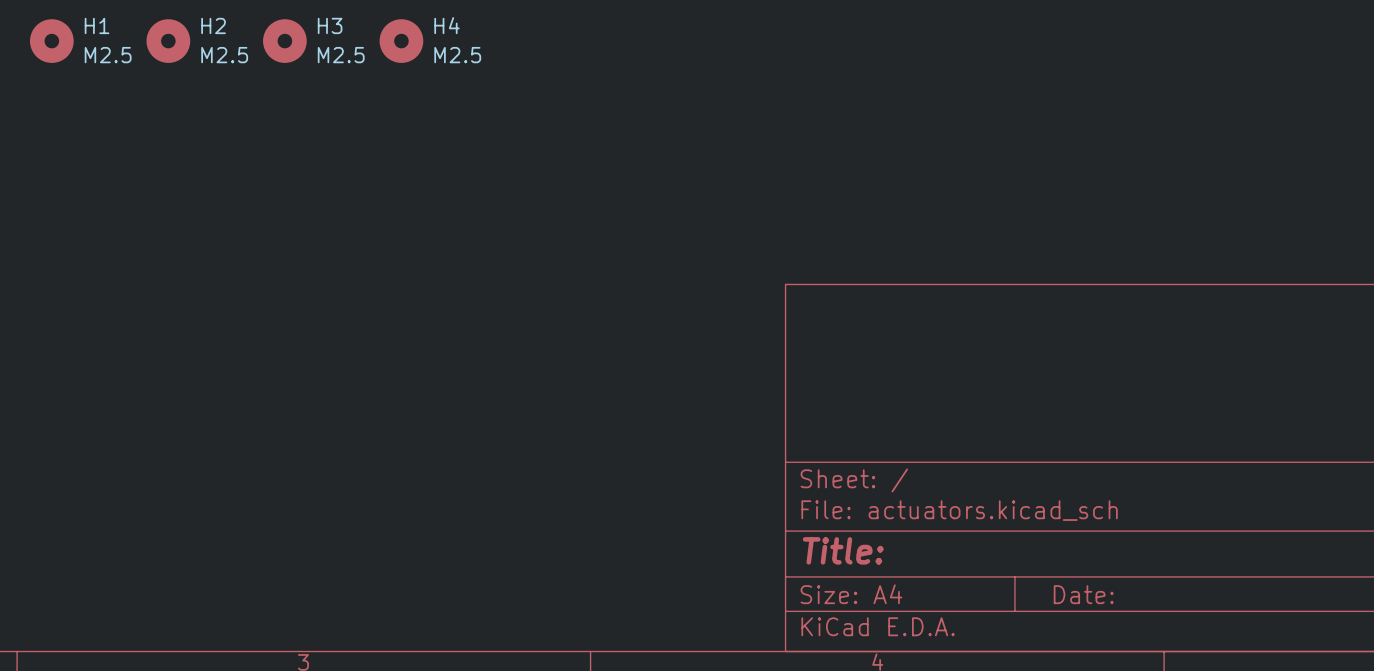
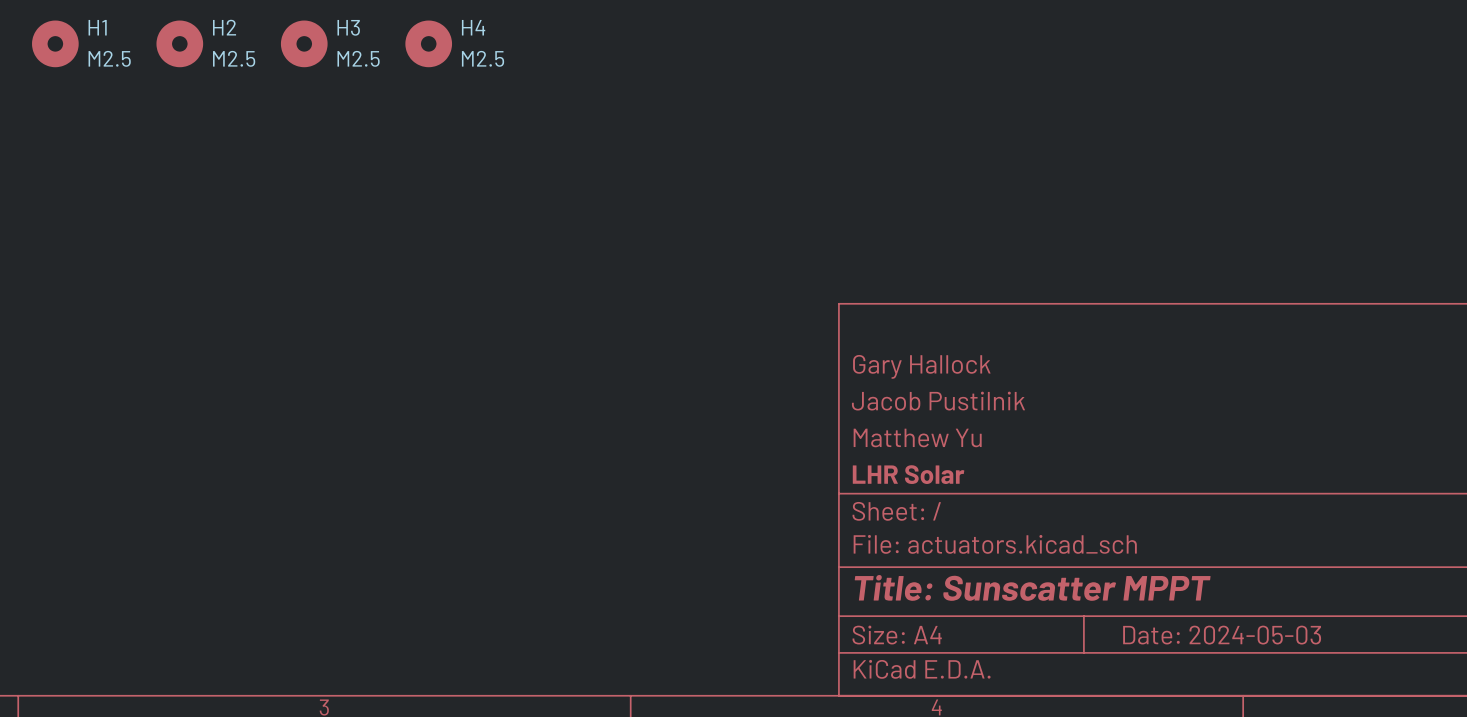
title block: none -> Gary Hallock (921, 366)
title block: none -> Jacob Pustilnik (938, 401)
title block: none -> Matthew Yu (917, 437)
title block: none -> LHR Solar (908, 474)
title block: Title: (843, 550) -> Title: Sunscatter MPPT (1032, 587)
title block: Date: (1083, 594) -> Date: 2024-05-03 (1222, 635)

